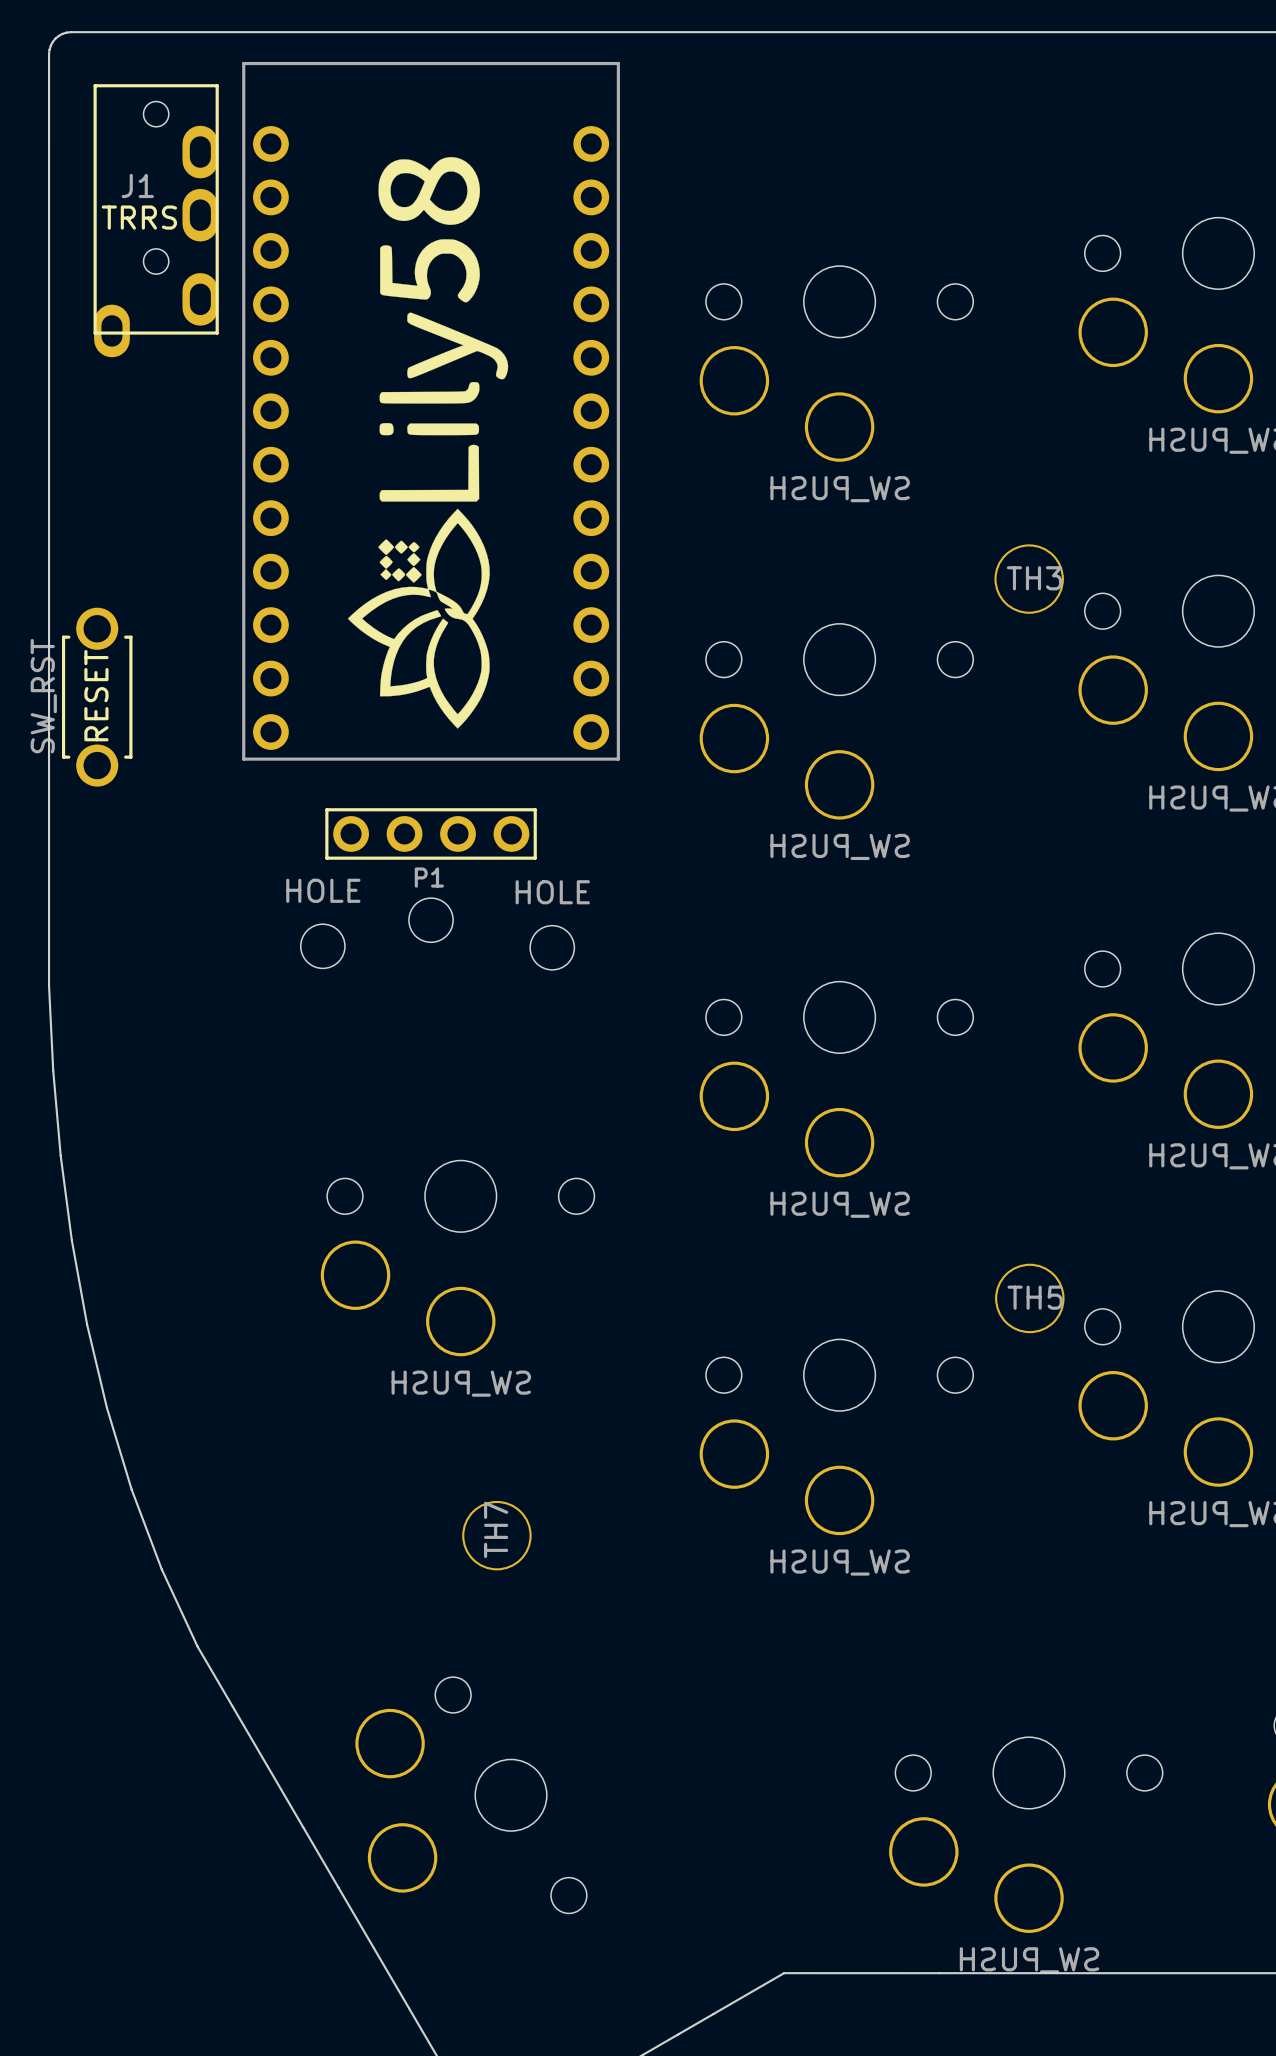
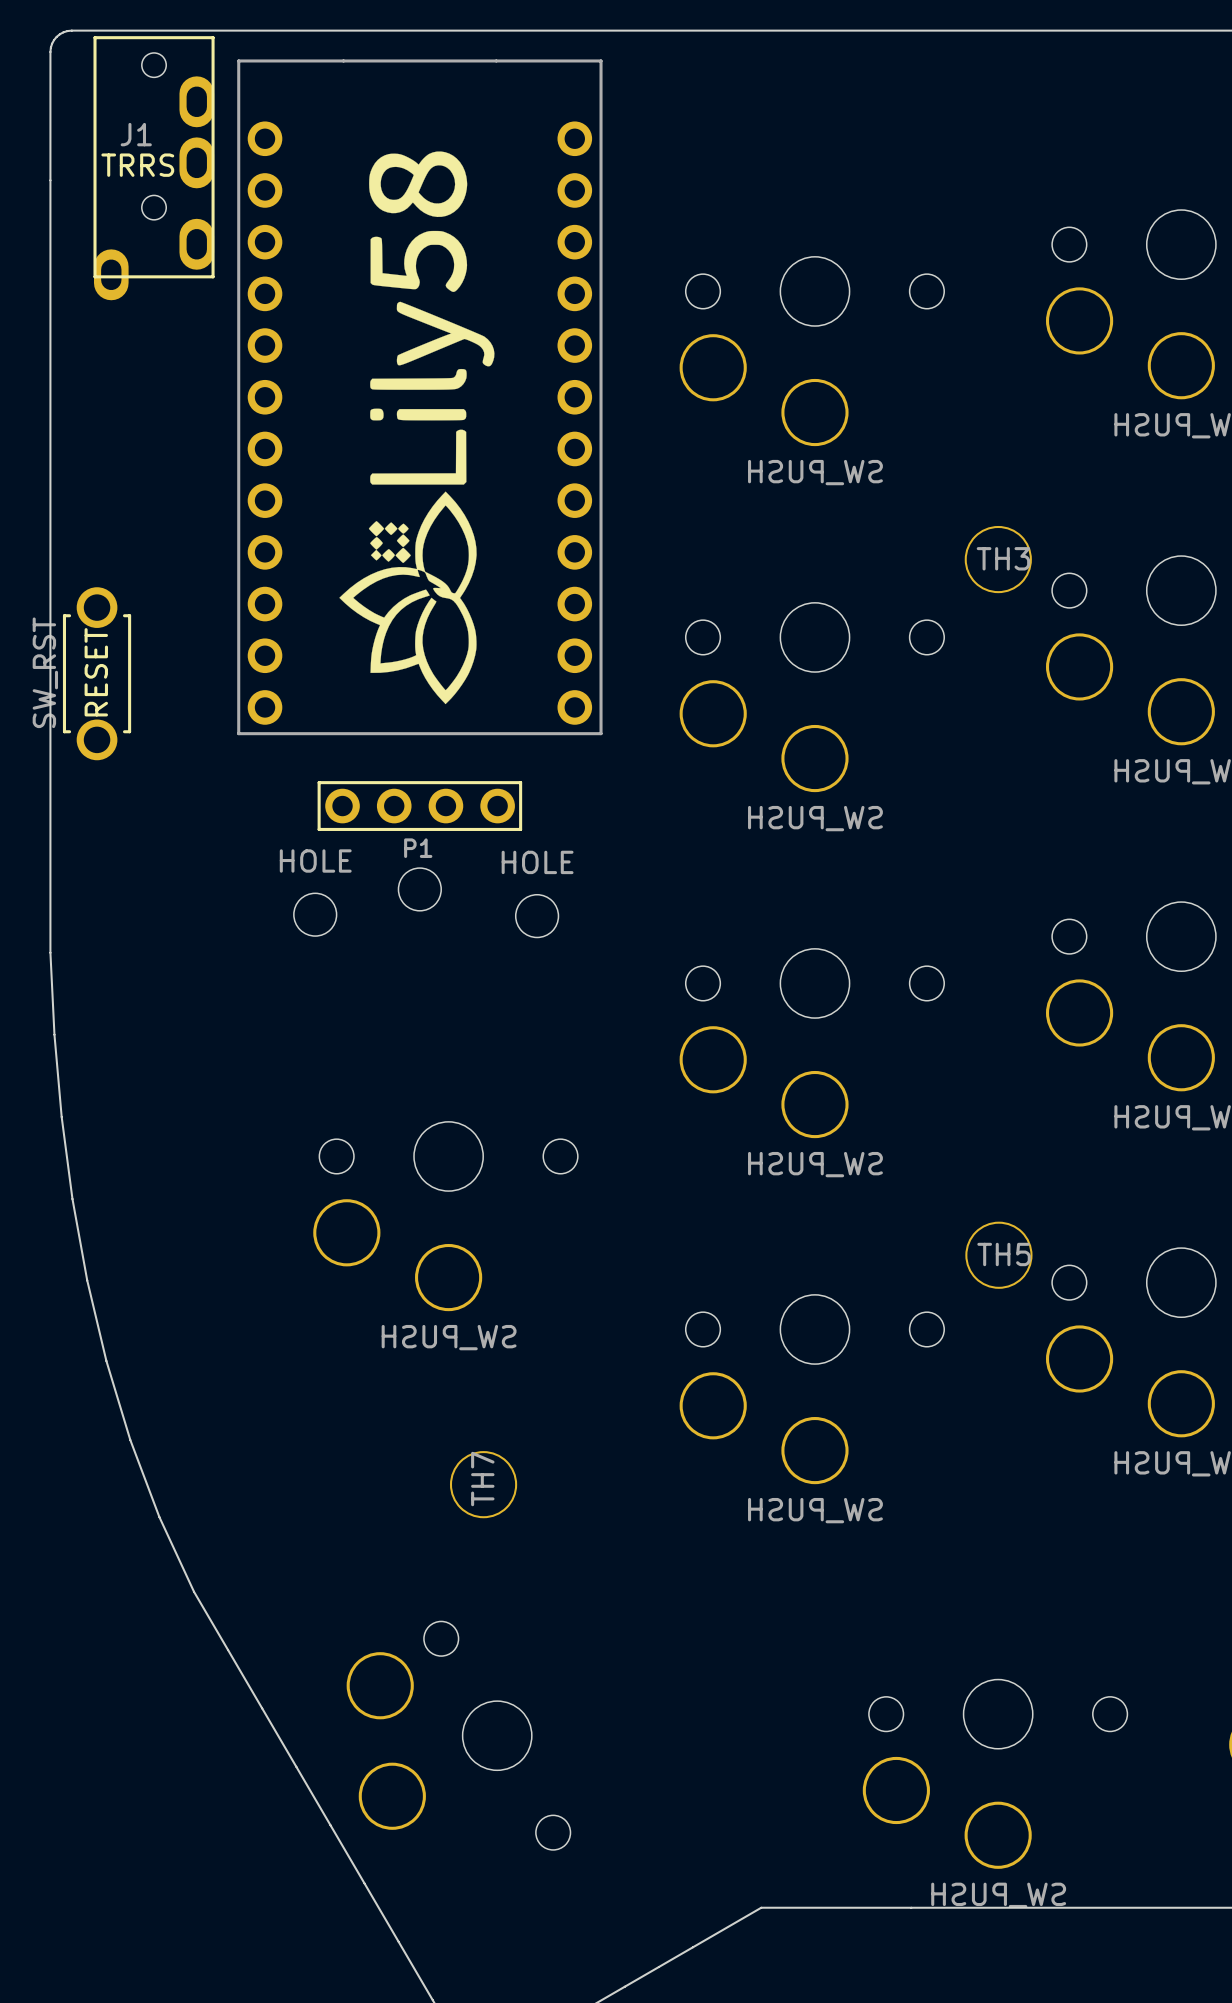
J1 position: (156, 220) -> (154, 168)

